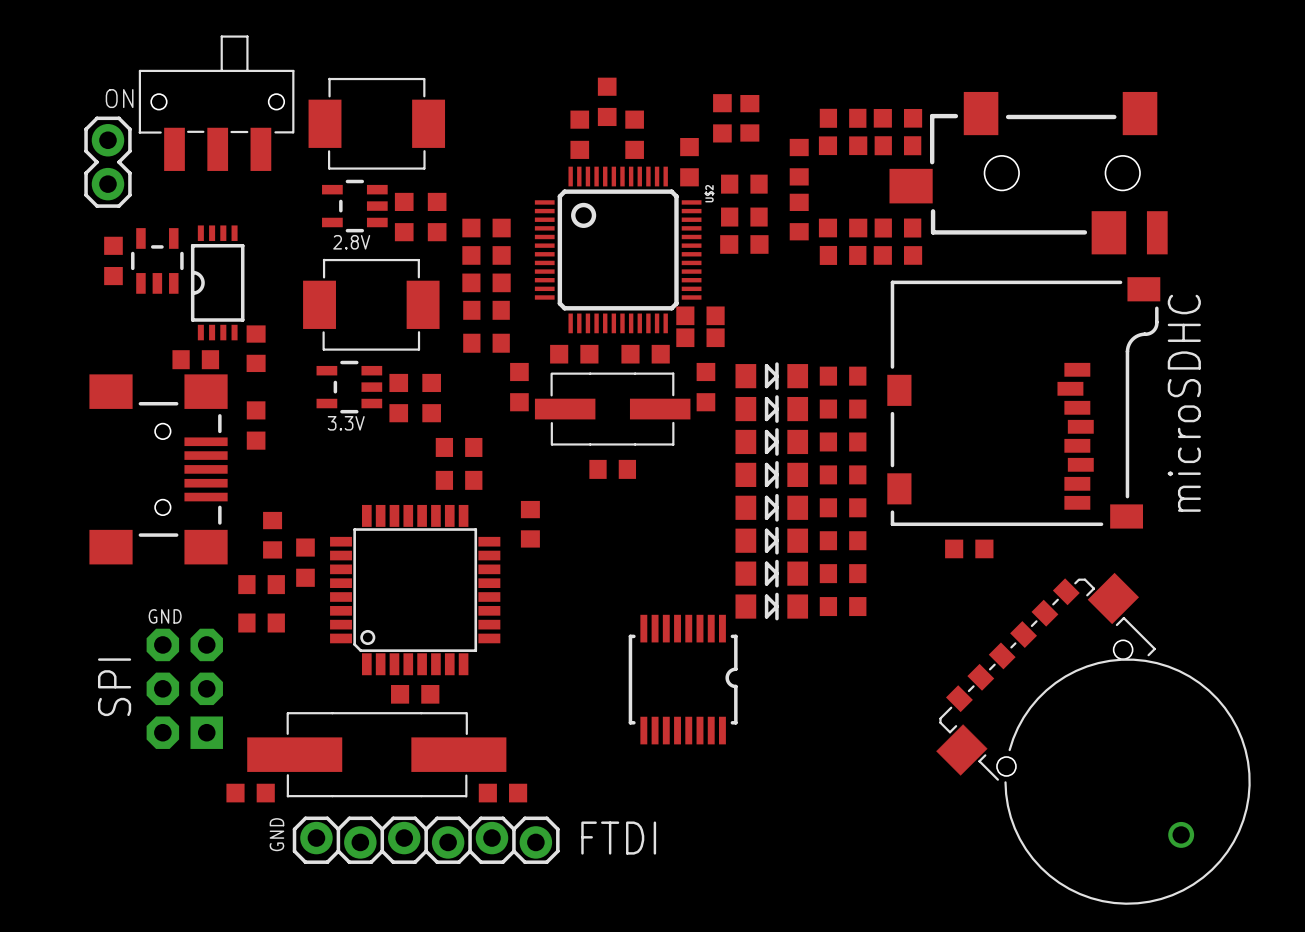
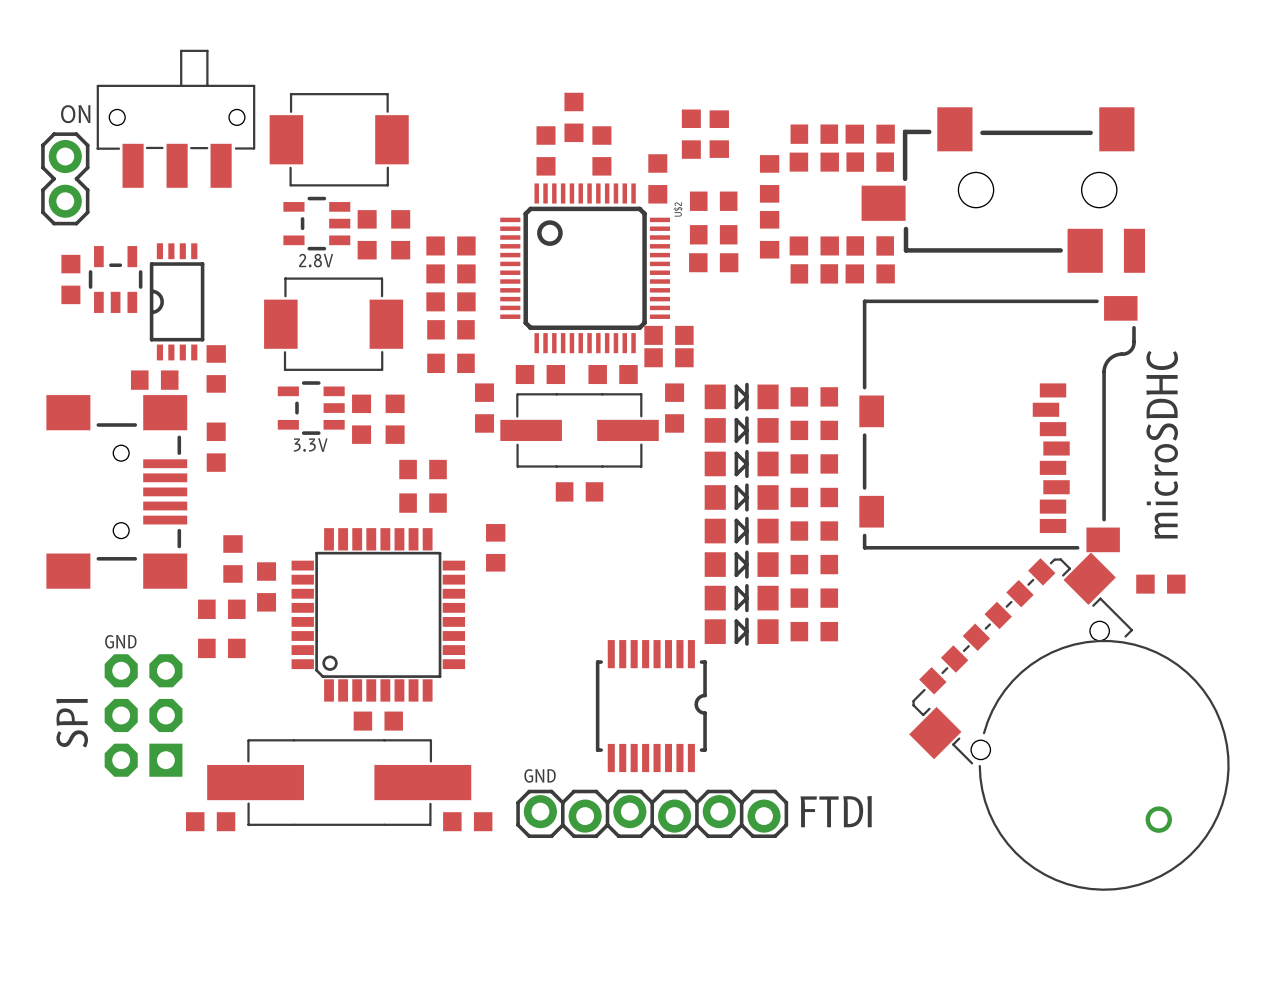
part position: (969, 548) -> (1160, 584)
part position: (1093, 738) -> (1069, 721)
text rotation: 0° (276, 834) -> 90° clockwise (540, 775)
text position: GND (276, 834) -> GND (540, 775)
text position: FTDI (618, 838) -> FTDI (836, 811)
part position: (426, 840) -> (652, 813)

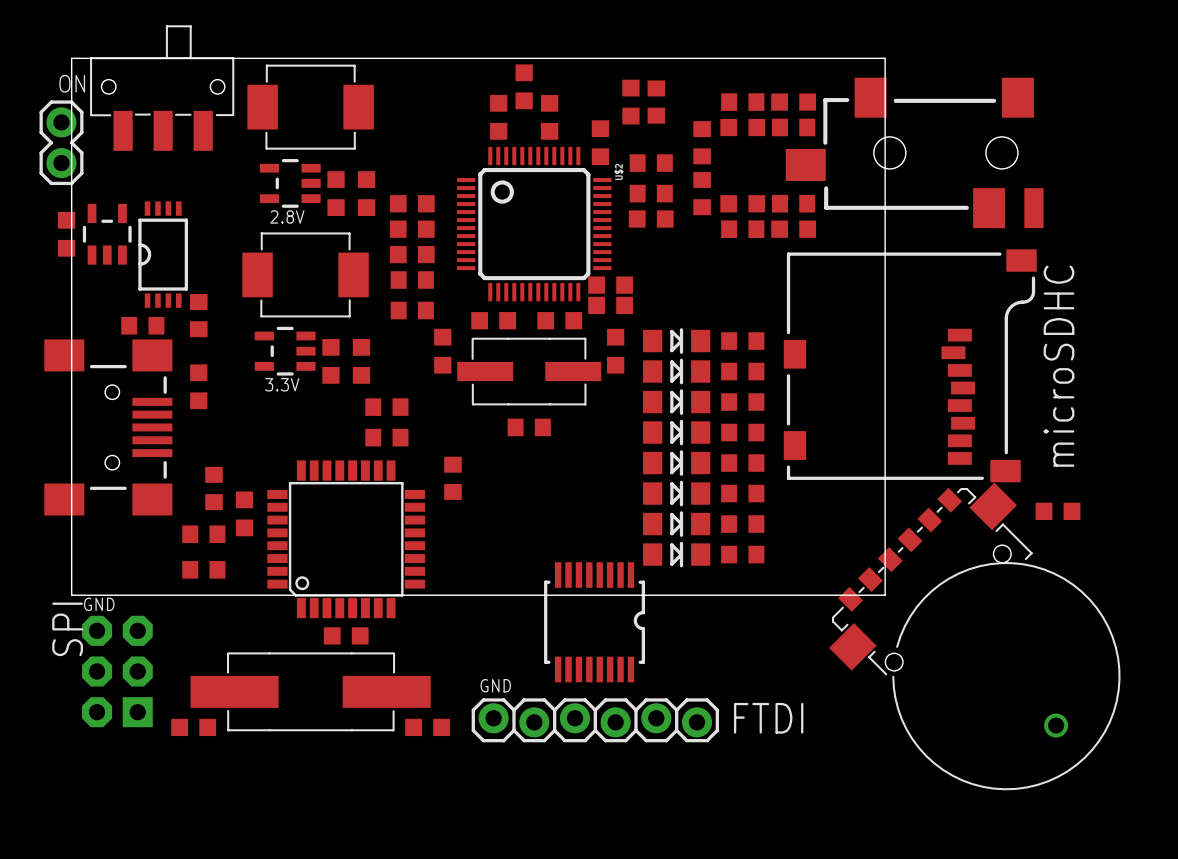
board edge: none -> (71, 58) (885, 58) (885, 595) (71, 595) (71, 58)
text position: GND (120, 641) -> GND (99, 604)
part position: (143, 715) -> (117, 671)

